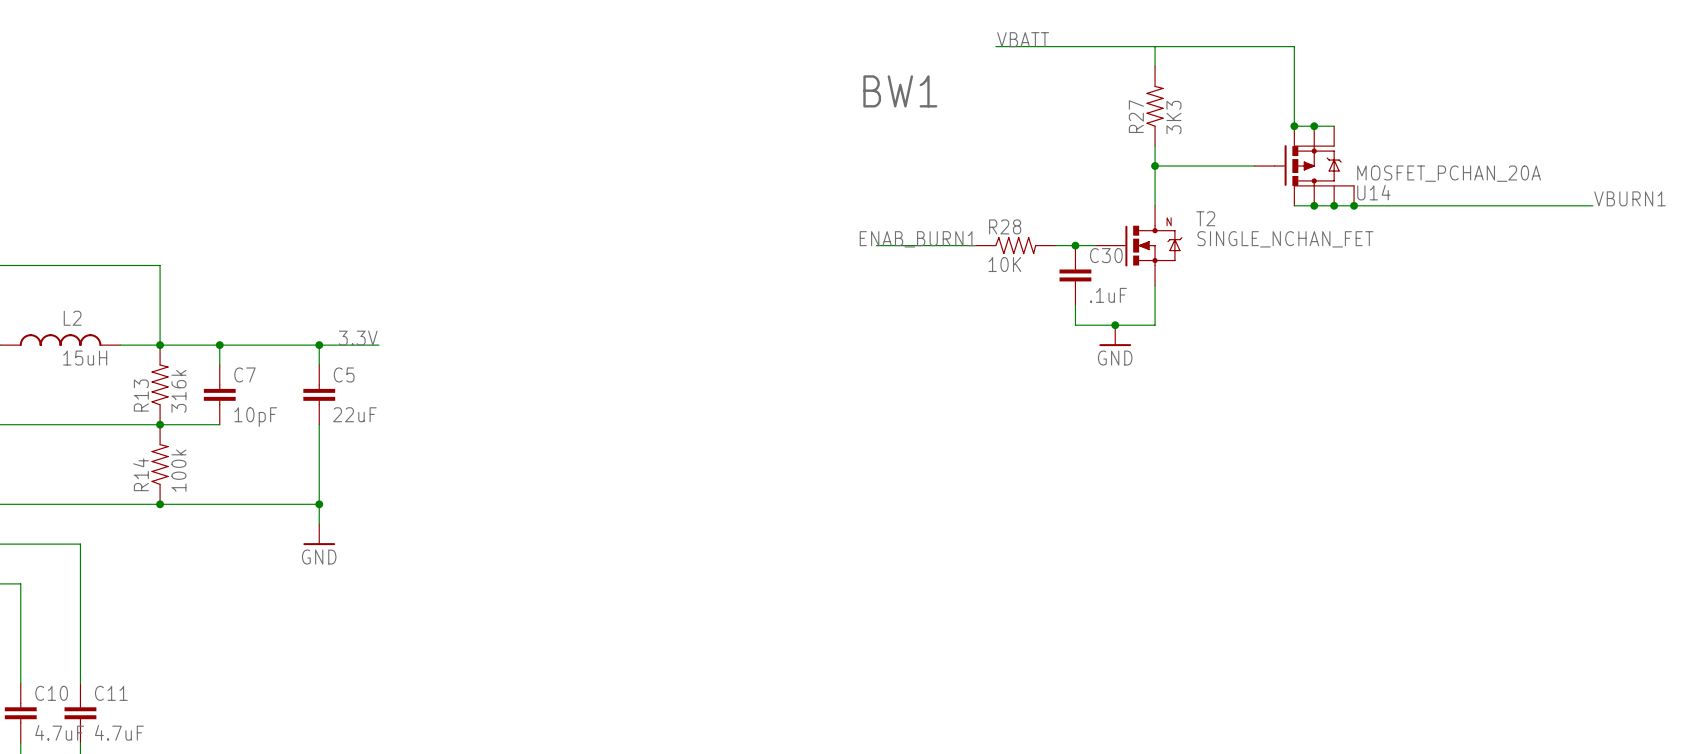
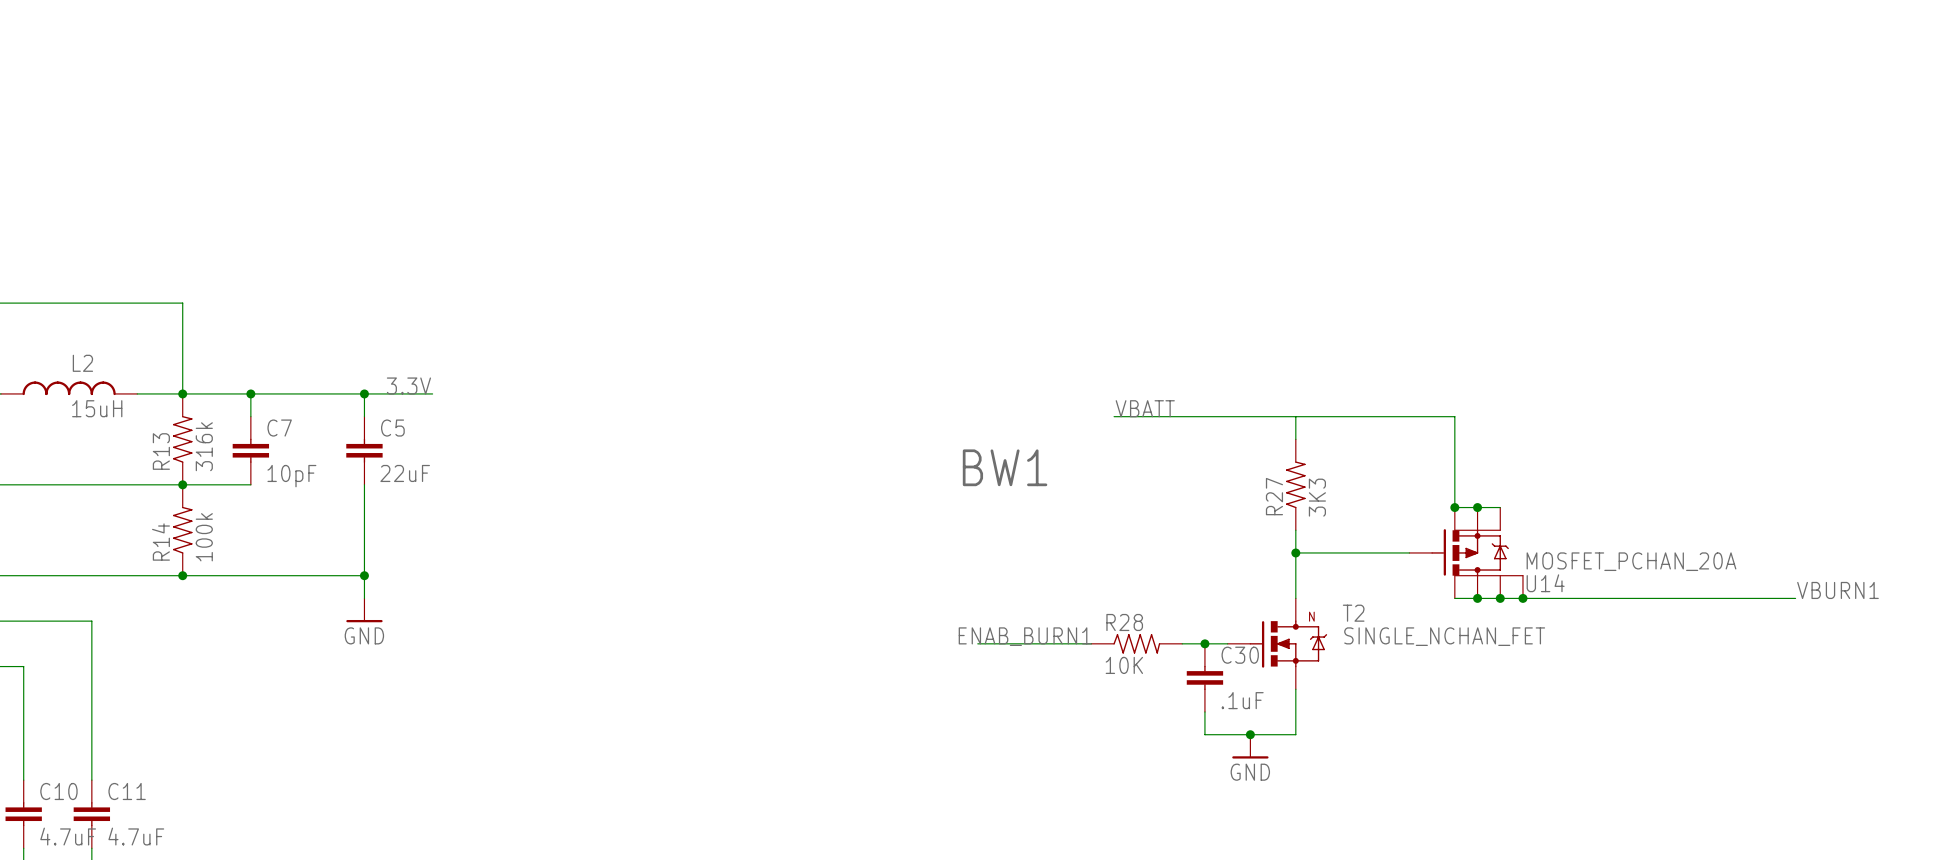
label: VBATT (1023, 39) -> none
wire: (995, 46) (1294, 46) (1294, 126) (1334, 126) -> none
wire: (1155, 46) (1155, 66) -> none
text: BW1 (900, 91) -> none
R27 position: (1155, 106) -> (1295, 484)
junction: (1294, 126) -> none
junction: (1314, 126) -> none
wire: (1155, 146) (1155, 205) -> none
wire: (1155, 166) (1254, 166) -> none
junction: (1155, 166) -> none
U14 position: (1304, 166) -> (1466, 552)
label: VBURN1 (1629, 198) -> none
wire: (1294, 205) (1592, 205) -> none
junction: (1314, 205) -> none
junction: (1334, 205) -> none
junction: (1354, 205) -> none
label: ENAB_BURN1 (917, 239) -> none
wire: (876, 245) (975, 245) -> none
R28 position: (1015, 245) -> (1136, 643)
wire: (1055, 245) (1095, 245) -> none
junction: (1075, 245) -> none
T2 position: (1138, 245) -> (1277, 643)
C30 position: (1075, 275) -> (1204, 677)
wire: (1155, 285) (1155, 325) (1075, 325) (1075, 305) -> none
junction: (1115, 325) -> none
power symbol: GND (1115, 335) -> none
label: none -> VBATT (1145, 408)
wire: none -> (1114, 416) (1454, 416) (1454, 507) (1500, 507)
wire: none -> (1295, 416) (1295, 439)
text: none -> BW1 (1005, 467)
junction: none -> (1454, 507)
junction: none -> (1477, 507)
wire: none -> (1295, 530) (1295, 598)
wire: none -> (1295, 552) (1409, 552)
junction: none -> (1295, 552)
label: none -> VBURN1 (1837, 590)
wire: none -> (1454, 598) (1795, 598)
junction: none -> (1477, 598)
junction: none -> (1500, 598)
junction: none -> (1522, 598)
label: none -> ENAB_BURN1 (1025, 636)
wire: none -> (977, 643) (1091, 643)
wire: none -> (1182, 643) (1227, 643)
junction: none -> (1204, 643)
wire: none -> (1295, 689) (1295, 734) (1204, 734) (1204, 711)
junction: none -> (1250, 734)
power symbol: none -> GND (1250, 746)

